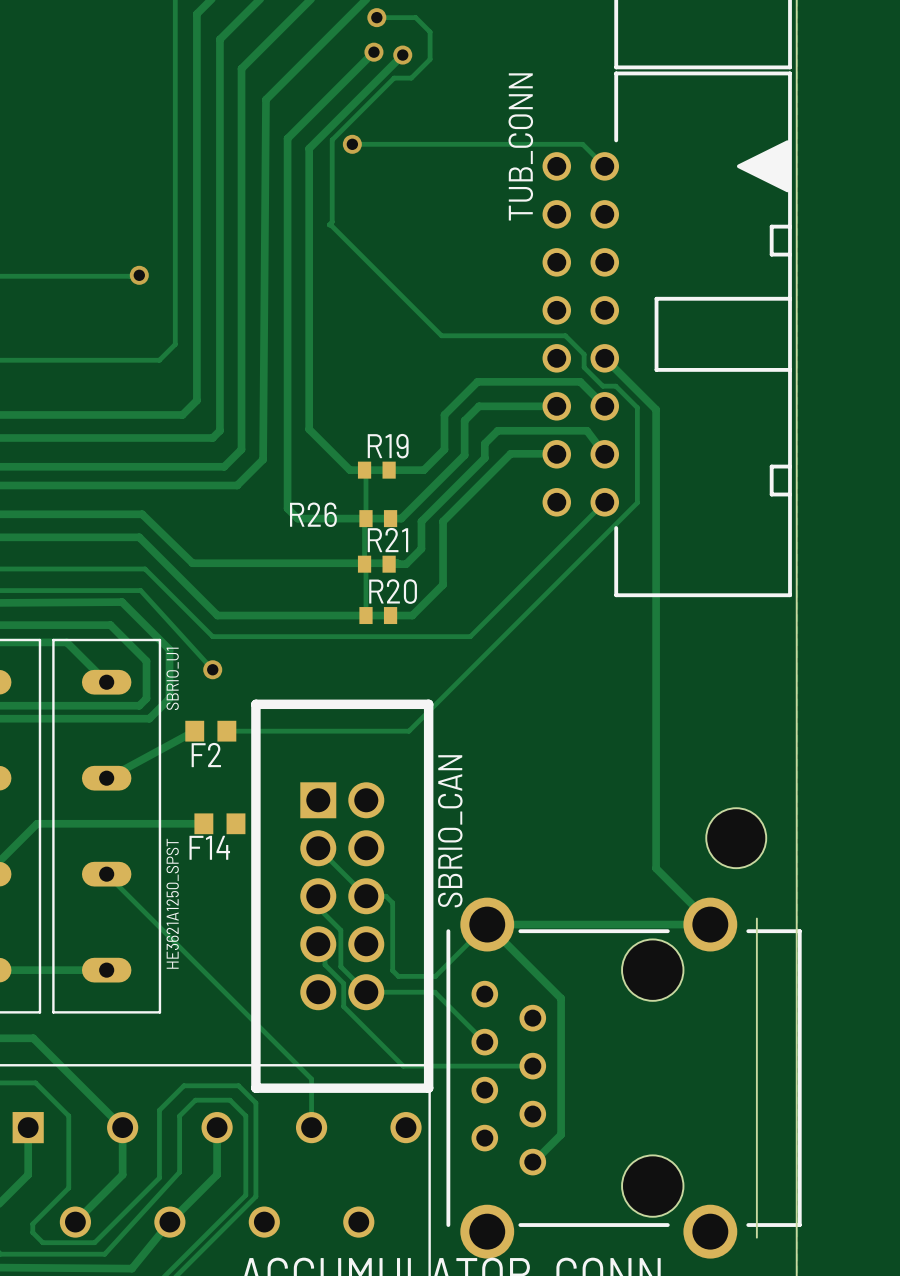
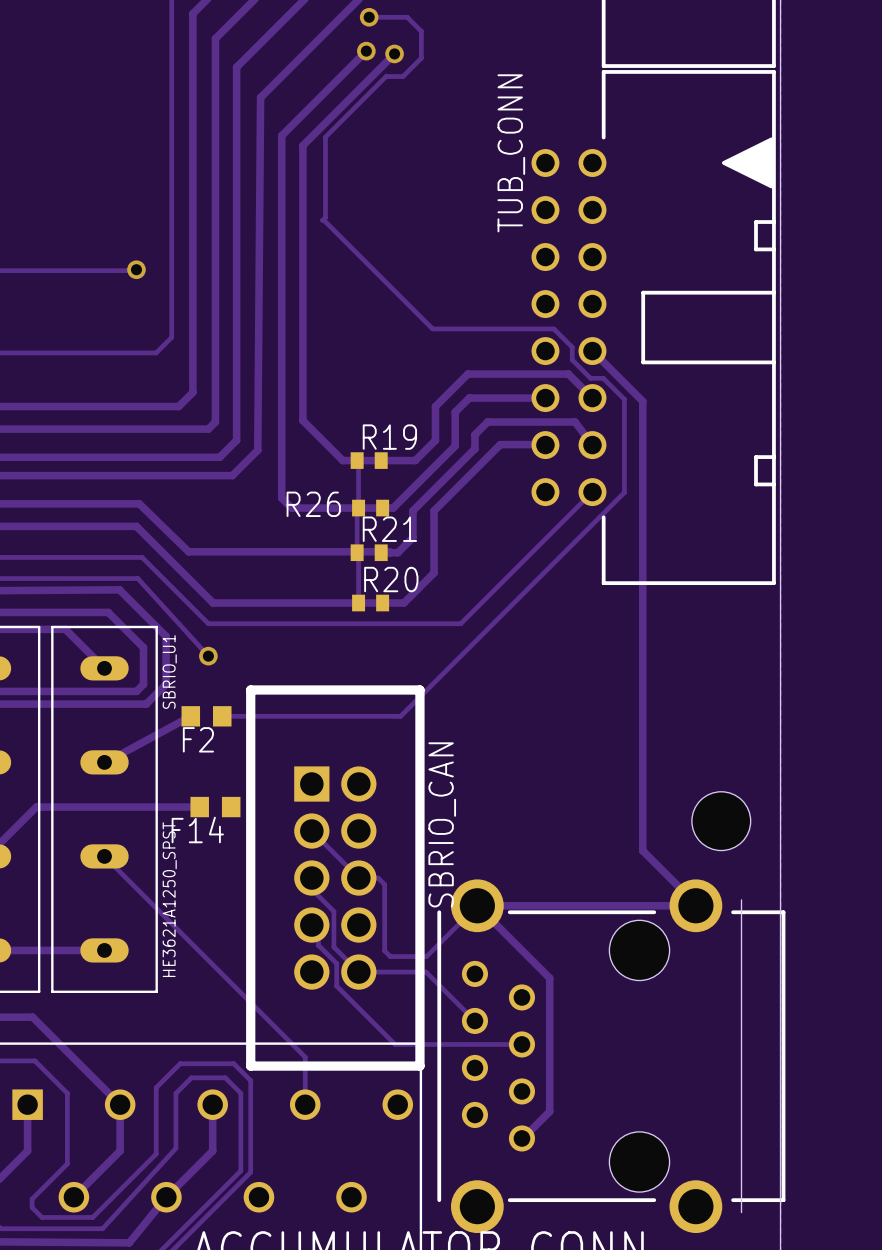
track: (352, 144) (582, 144) (604, 166) -> none
via: (352, 144) -> none

